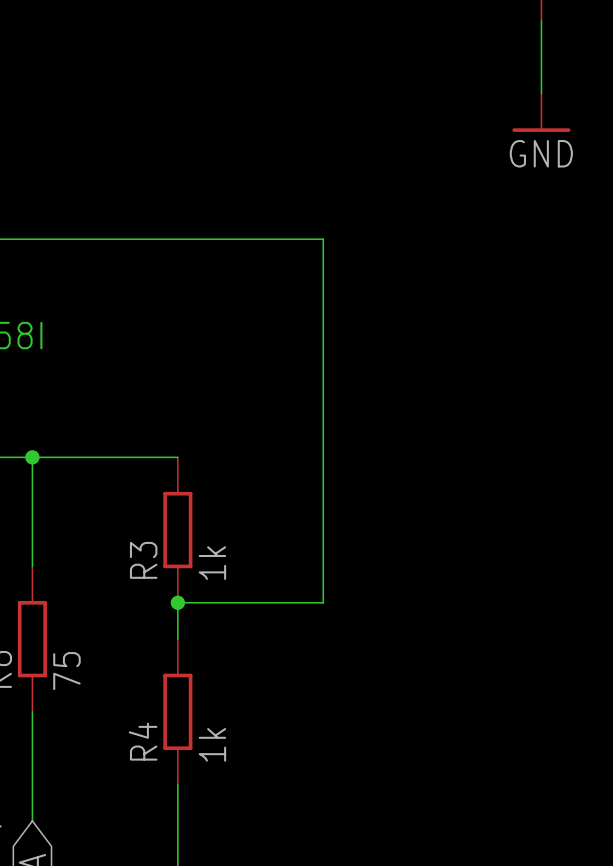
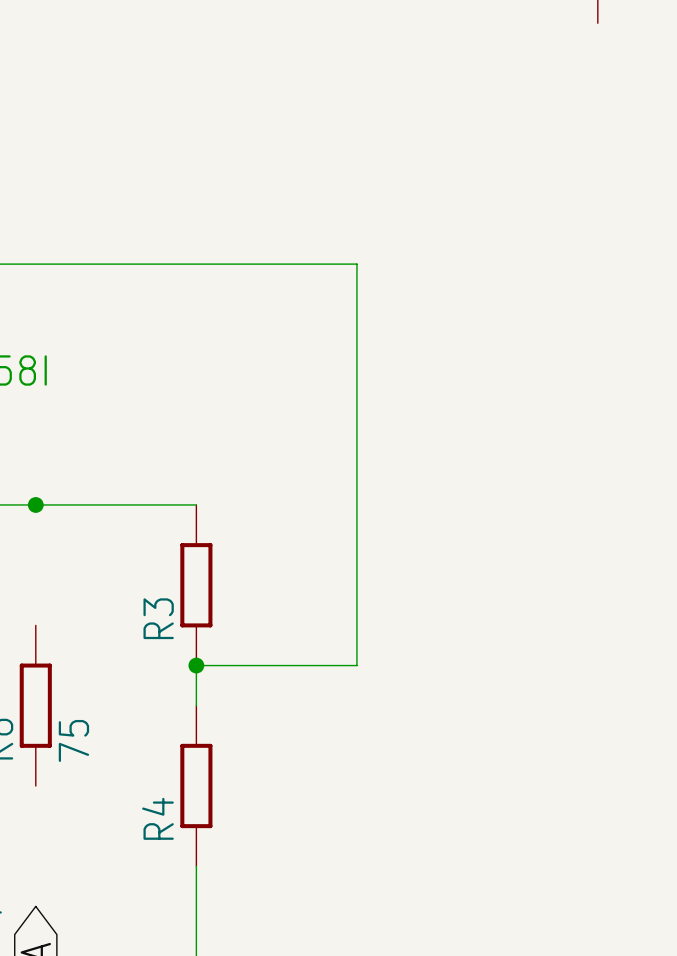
wire: (541, 21) (541, 93) -> none
power symbol: GND (541, 112) -> none
wire: (32, 457) (32, 566) -> none
R3 value: 1k (212, 563) -> none
wire: (32, 711) (32, 820) -> none
R4 value: 1k (212, 744) -> none

